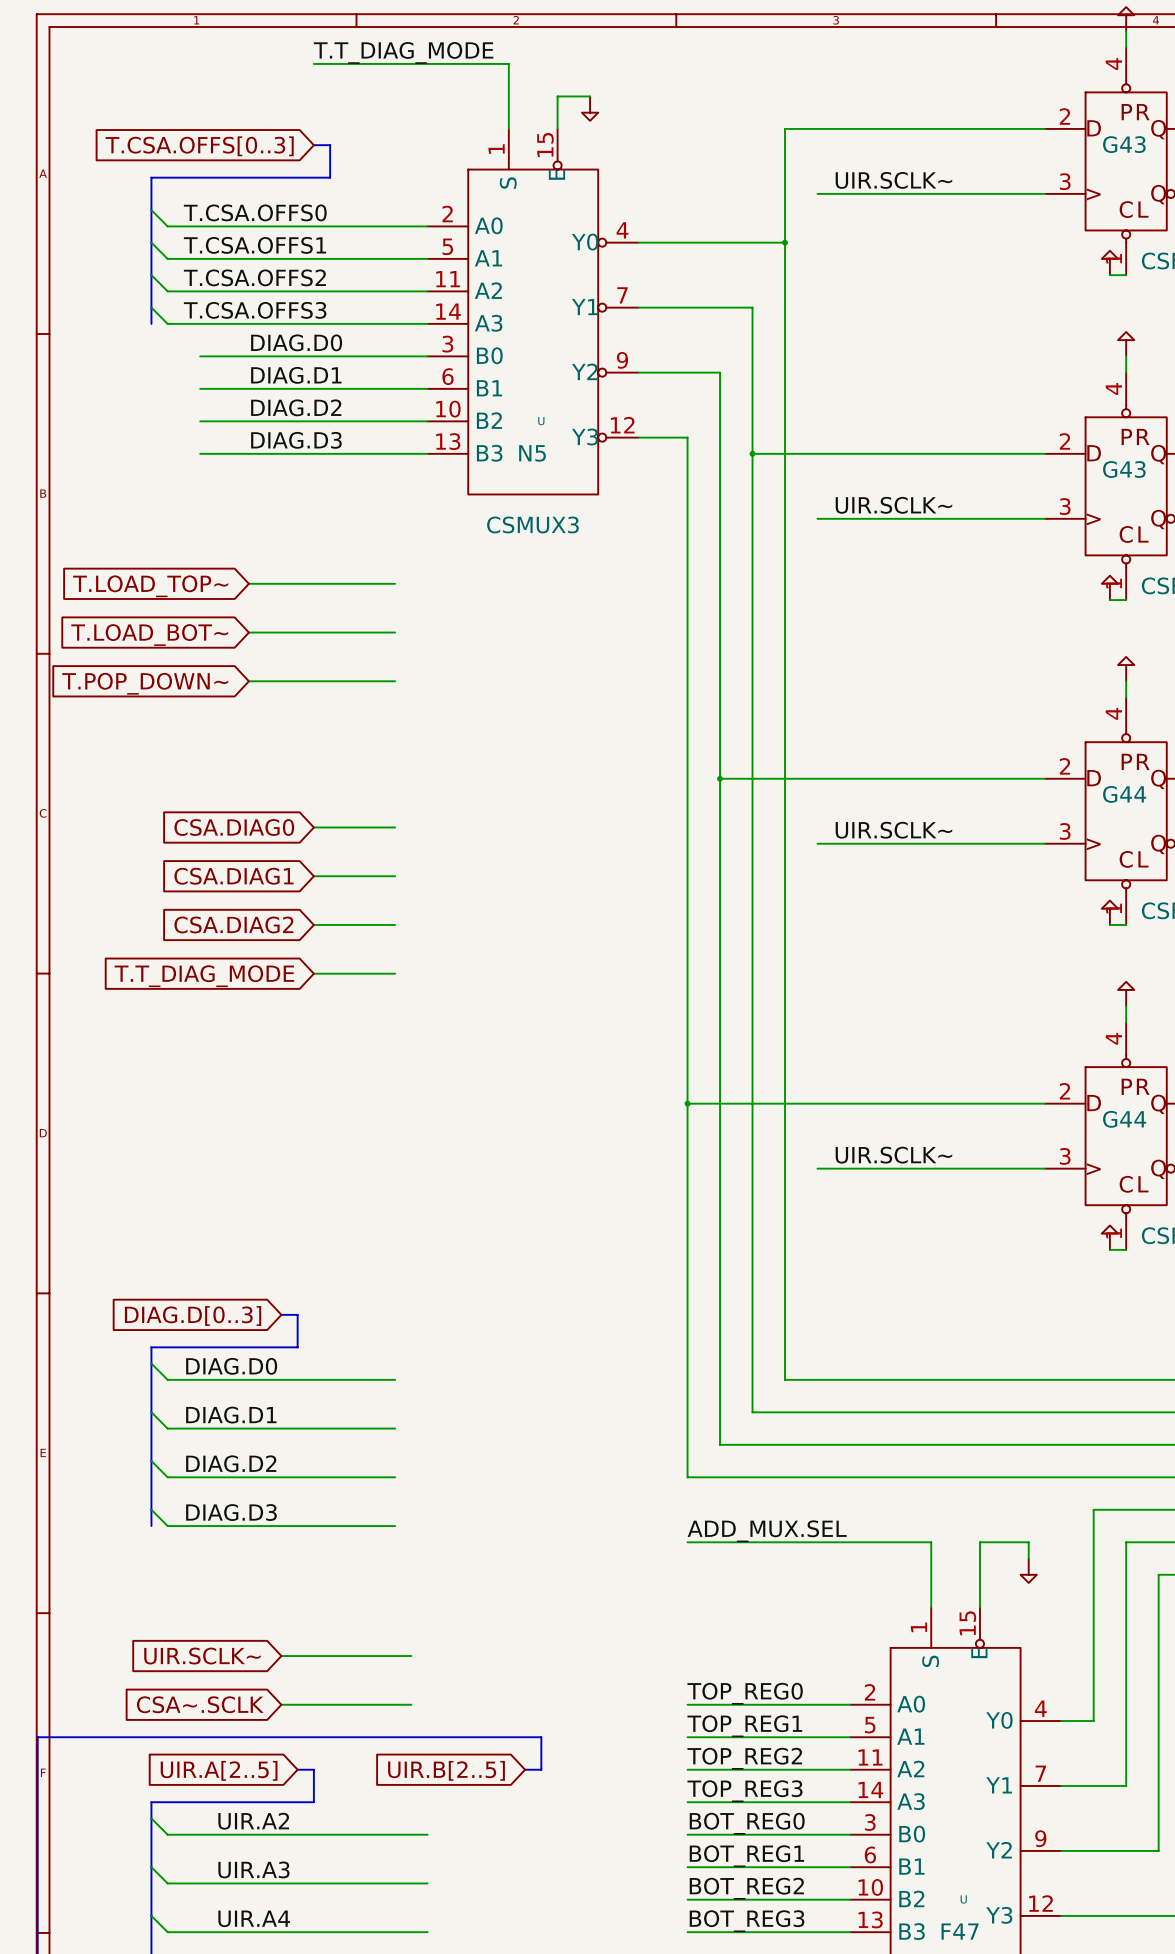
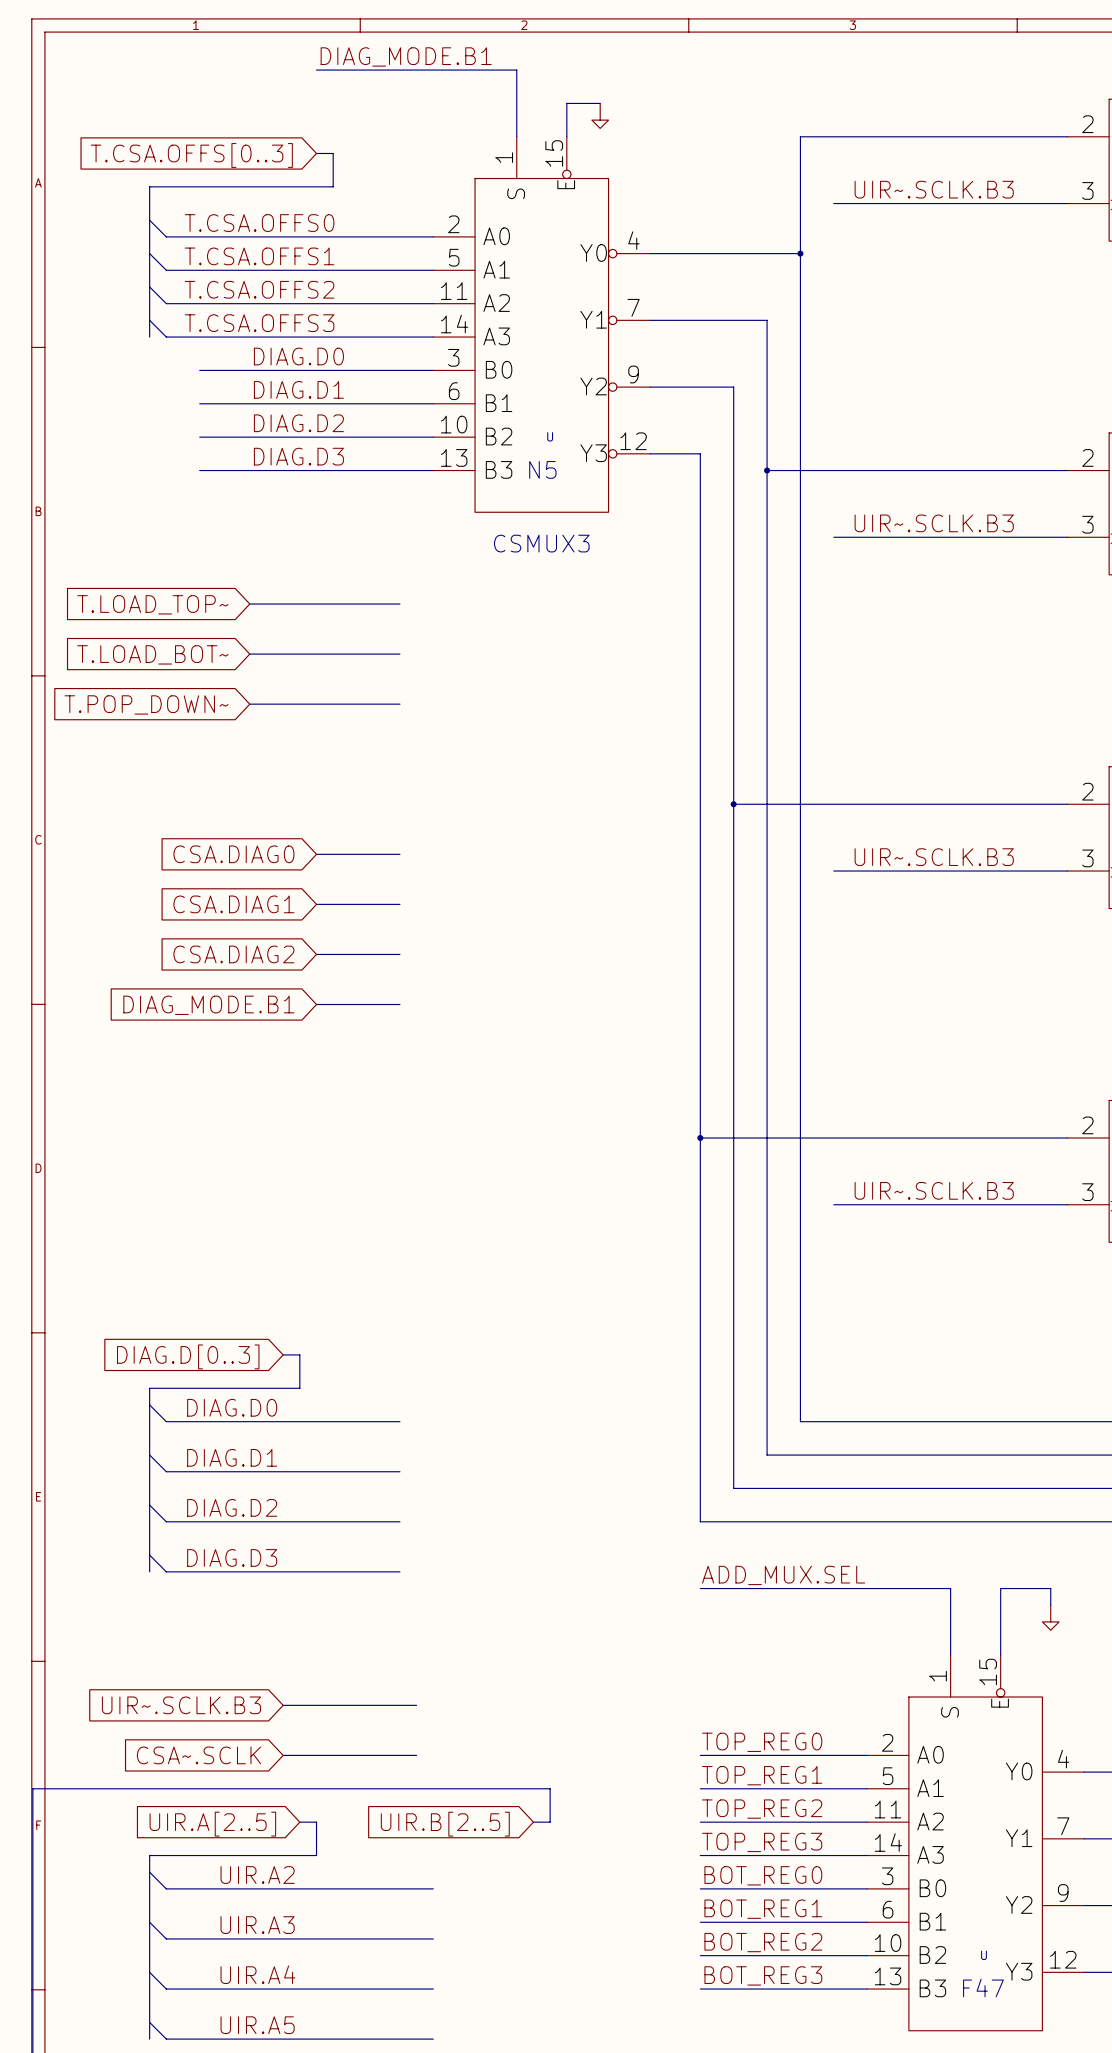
label: T.T_DIAG_MODE (403, 52) -> DIAG_MODE.B1 (406, 56)
label: UIR.SCLK~ (893, 180) -> UIR~.SCLK.B3 (934, 189)
label: UIR.SCLK~ (893, 505) -> UIR~.SCLK.B3 (934, 523)
label: UIR.SCLK~ (893, 830) -> UIR~.SCLK.B3 (934, 857)
global label: T.T_DIAG_MODE (204, 976) -> DIAG_MODE.B1 (208, 1005)
label: UIR.SCLK~ (893, 1155) -> UIR~.SCLK.B3 (934, 1190)
global label: UIR.SCLK~ (202, 1656) -> UIR~.SCLK.B3 (181, 1705)

